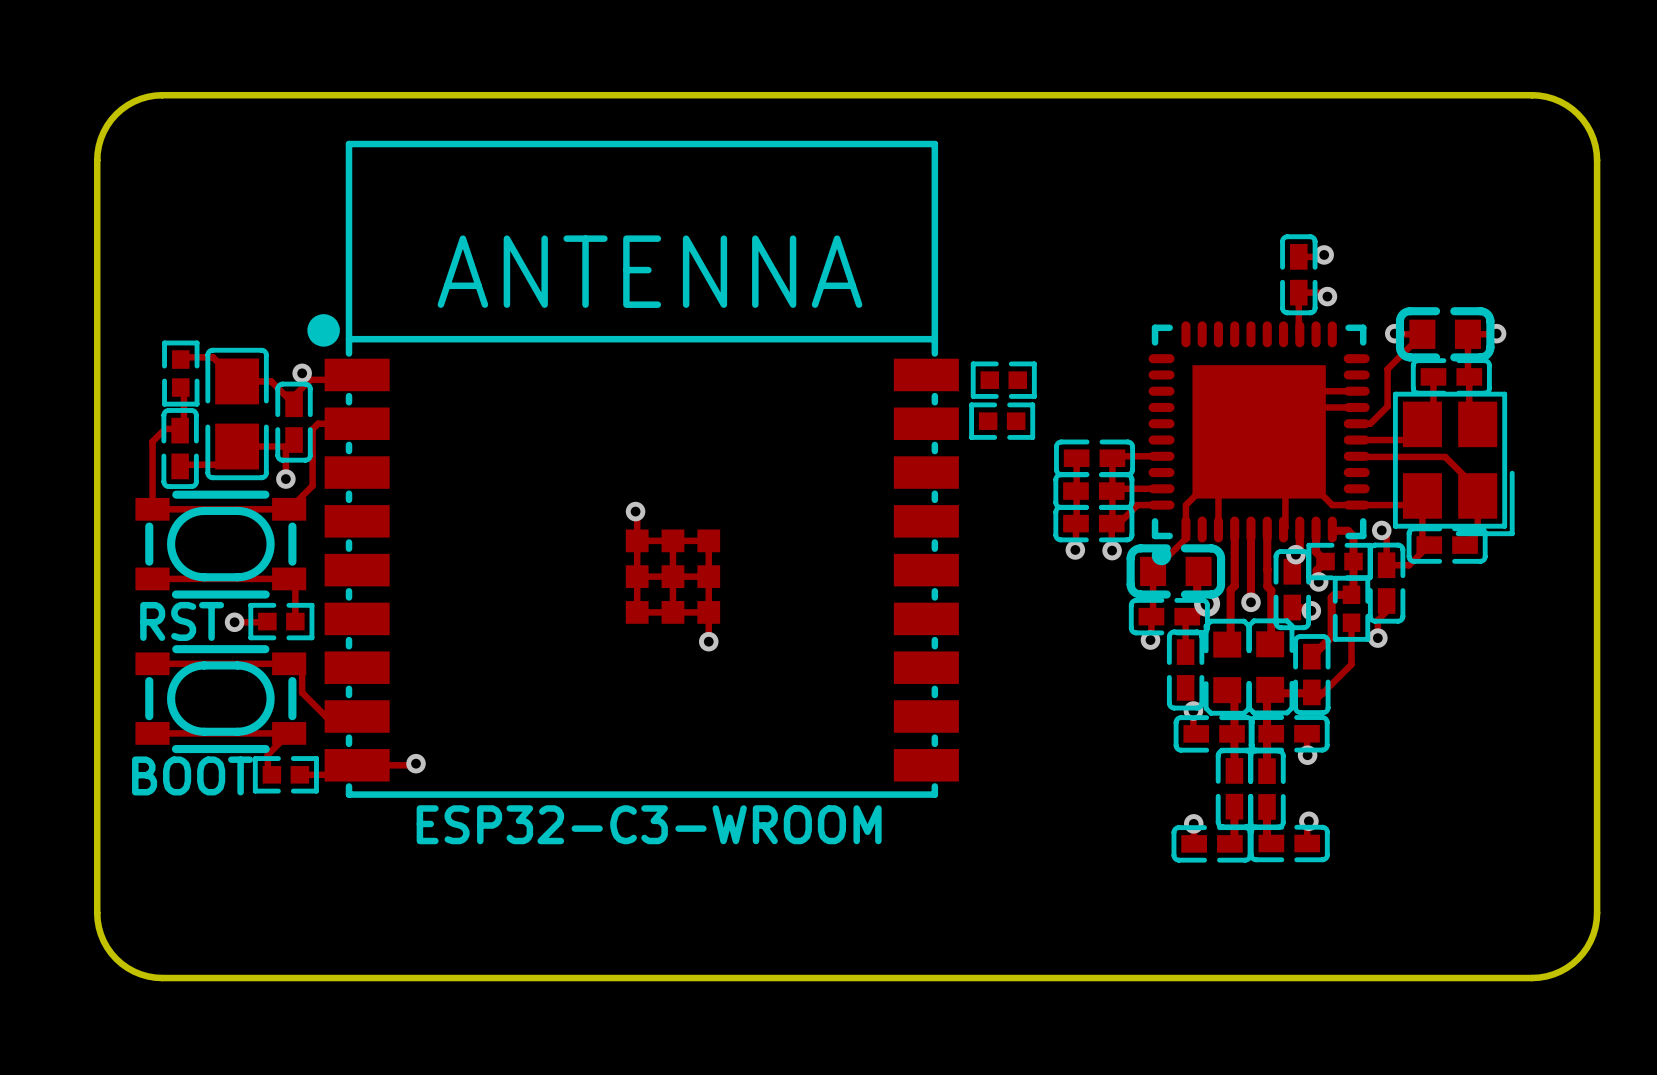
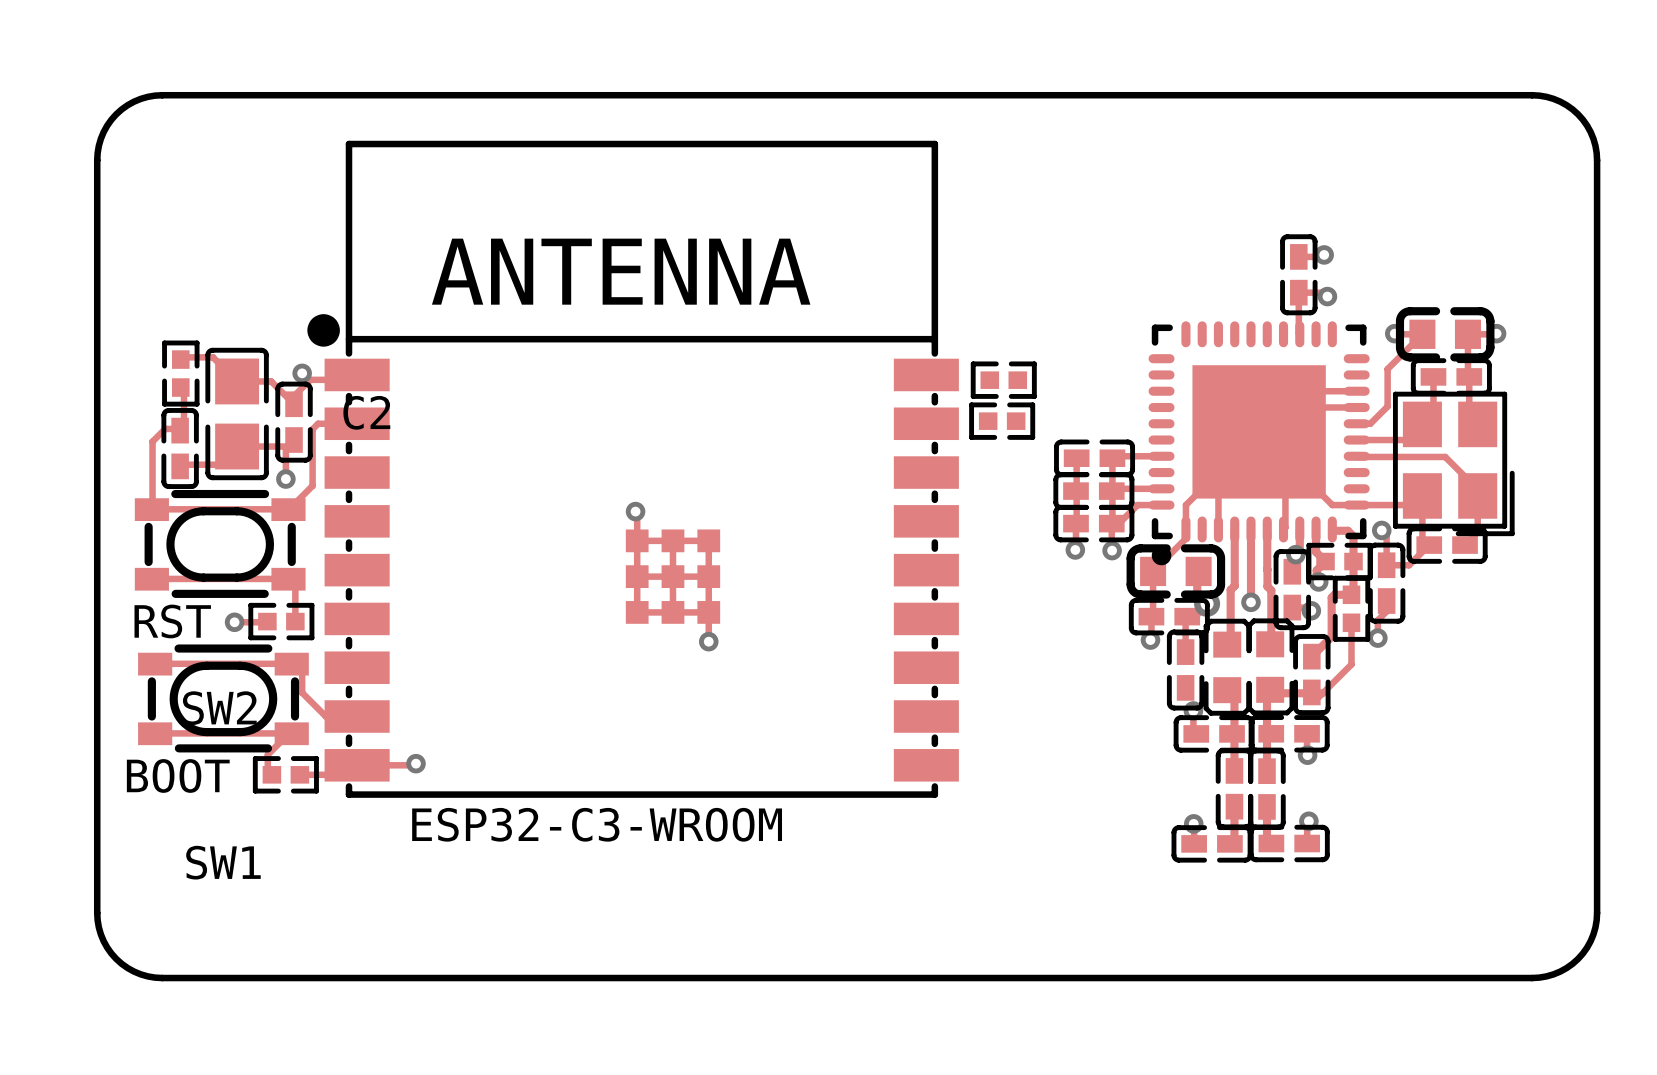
C2 name: none -> C2 (366, 412)
SW2: none -> (220, 543)
part: (220, 544) -> none
SW1: none -> (223, 698)
part: (220, 699) -> none

